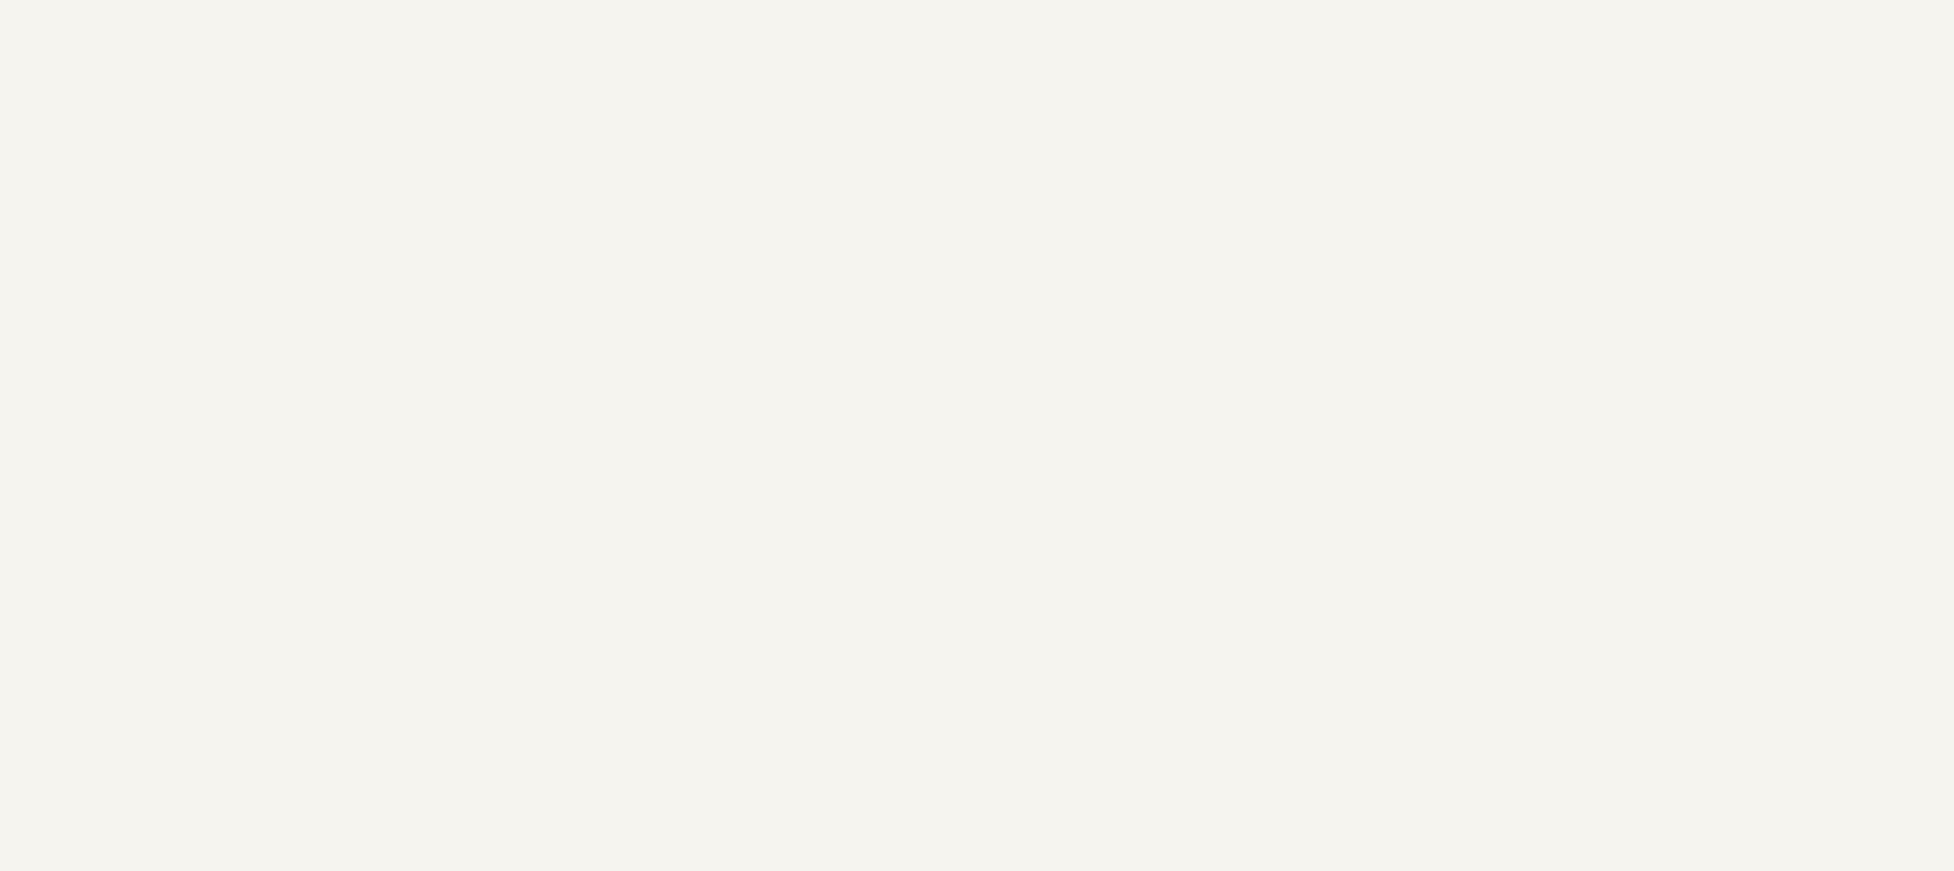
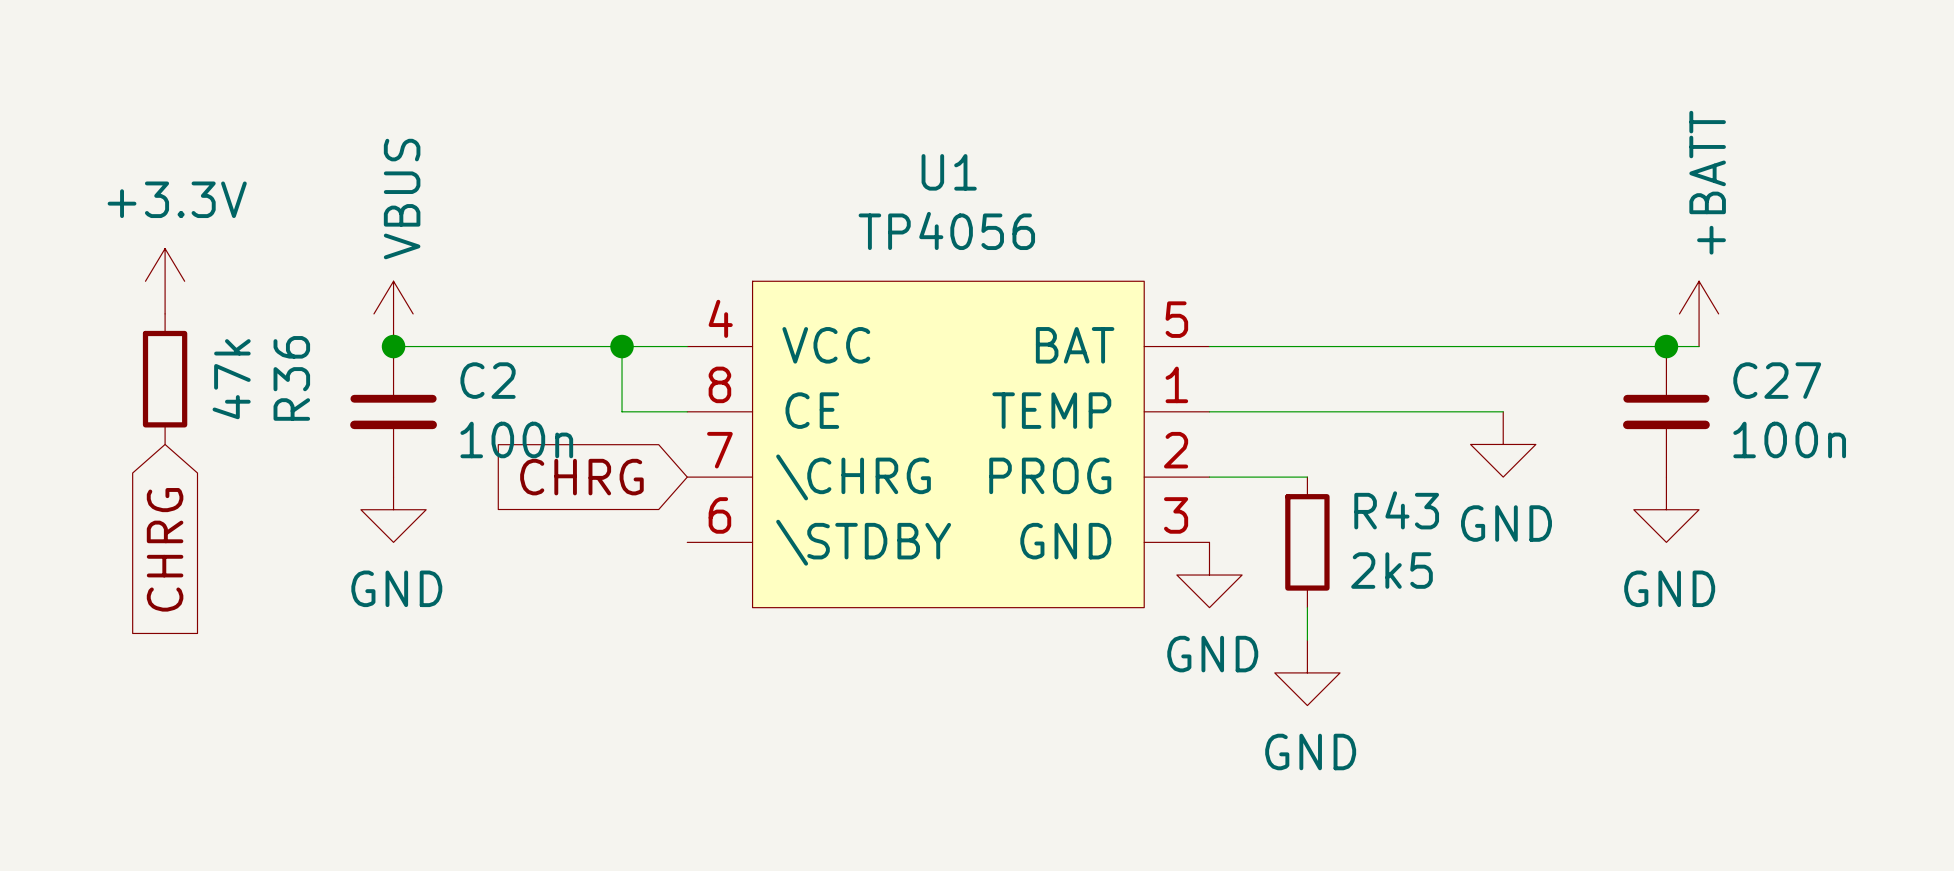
power symbol: none -> +3.3V (165, 281)
power symbol: none -> VBUS (393, 313)
power symbol: none -> +BATT (1699, 313)
wire: none -> (393, 346) (687, 346)
junction: none -> (393, 346)
wire: none -> (622, 346) (622, 411) (687, 411)
junction: none -> (622, 346)
wire: none -> (1209, 346) (1699, 346)
junction: none -> (1666, 346)
R36: none -> 47k (165, 379)
C2: none -> 100n (393, 411)
wire: none -> (1209, 411) (1503, 411)
C27: none -> 100n (1666, 411)
U1: none -> TP4056 (948, 444)
power symbol: none -> GND (1503, 444)
global label: none -> CHRG (581, 477)
wire: none -> (1209, 477) (1307, 477)
power symbol: none -> GND (393, 509)
power symbol: none -> GND (1666, 509)
R43: none -> 2k5 (1307, 542)
global label: none -> CHRG (165, 549)
power symbol: none -> GND (1209, 575)
wire: none -> (1307, 607) (1307, 640)
power symbol: none -> GND (1307, 672)

